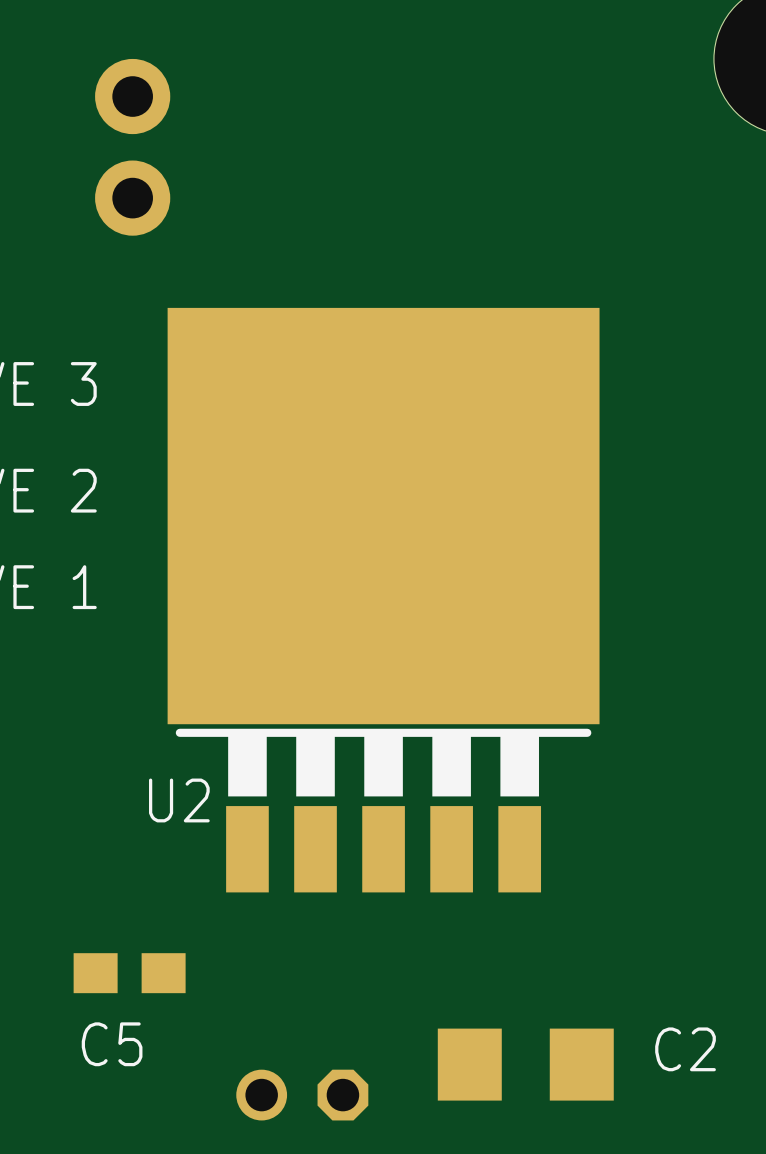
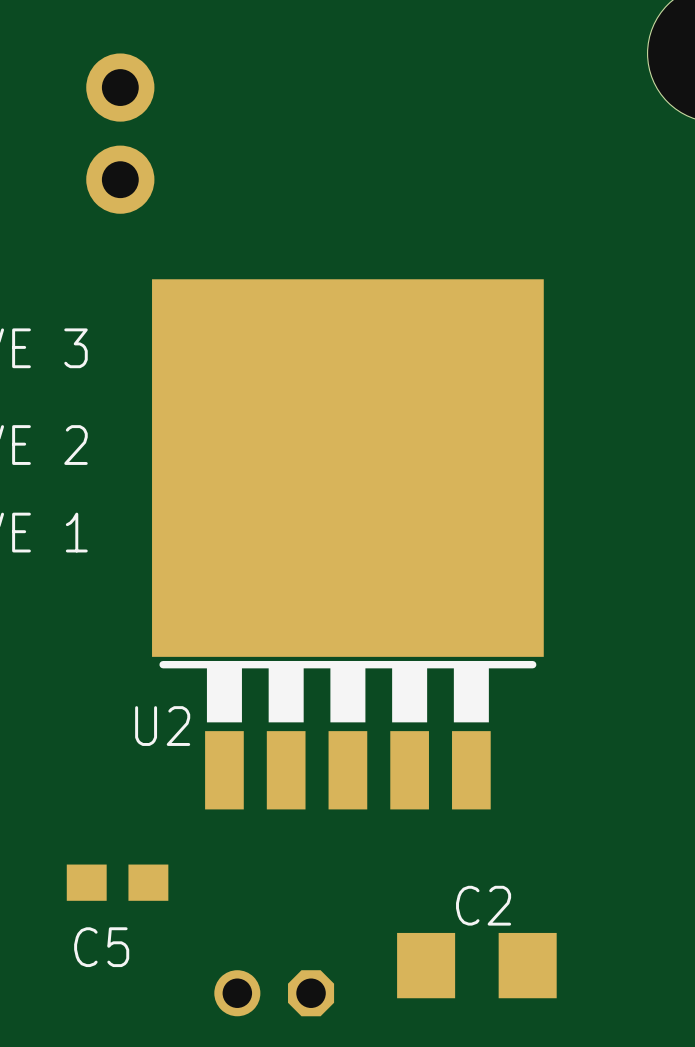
C2 name position: C2 (685, 1049) -> C2 (483, 905)

